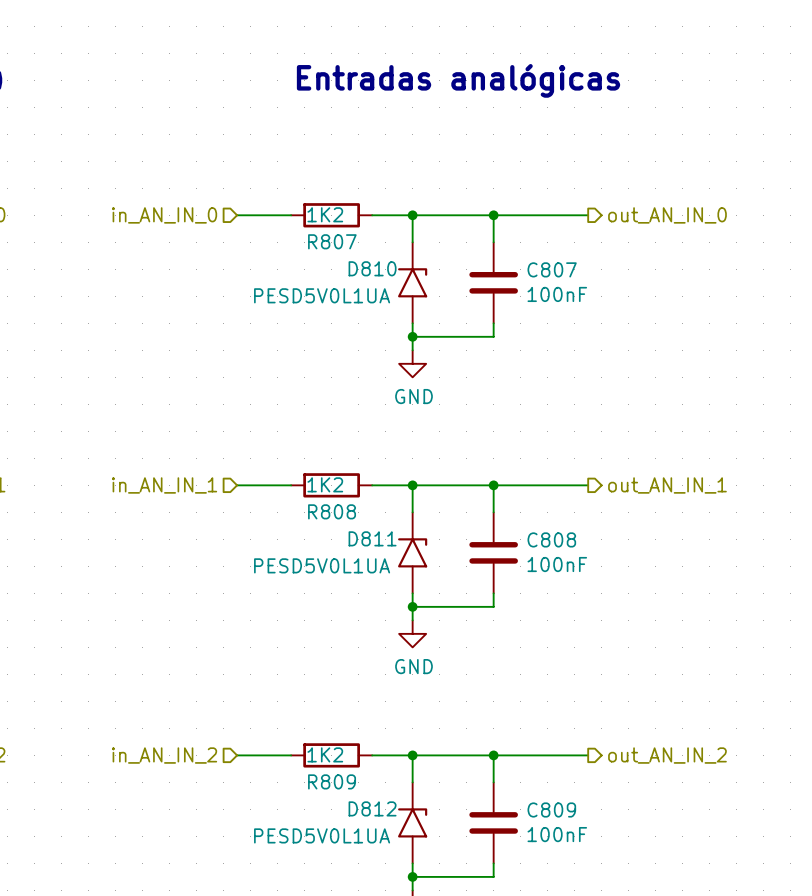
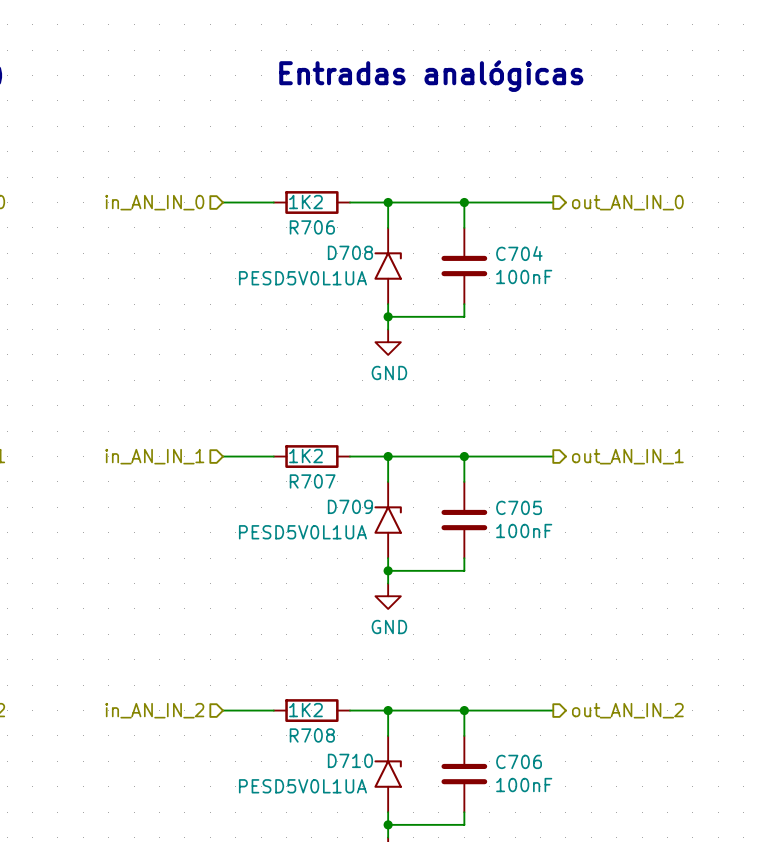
R807 name: R807 (332, 241) -> R706 (312, 227)
D810 name: D810 (372, 268) -> D708 (350, 252)
C807 name: C807 (552, 269) -> C704 (519, 253)
R808 name: R808 (332, 511) -> R707 (312, 481)
D811 name: D811 (372, 538) -> D709 (350, 506)
C808 name: C808 (551, 539) -> C705 (519, 507)
R809 name: R809 (332, 781) -> R708 (312, 735)
D812 name: D812 (372, 808) -> D710 (350, 760)
C809 name: C809 (551, 809) -> C706 (519, 761)

